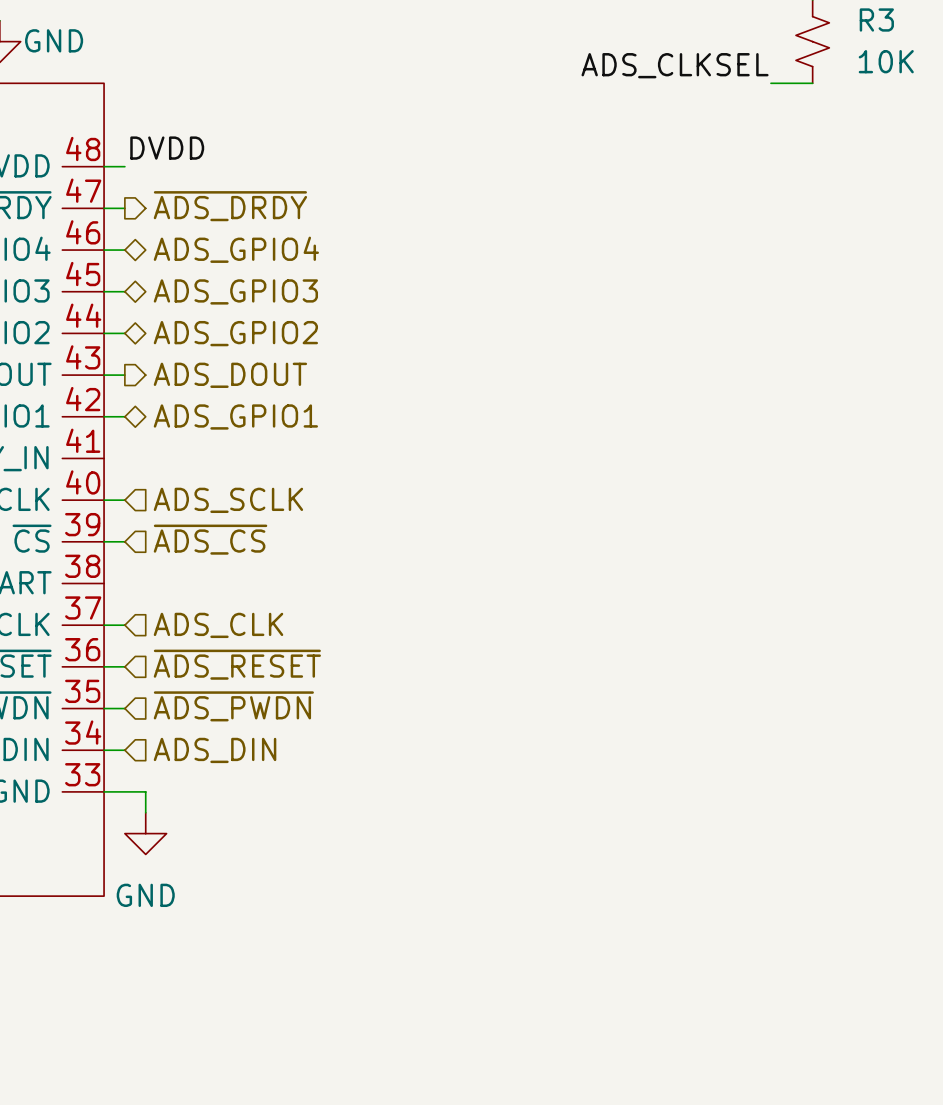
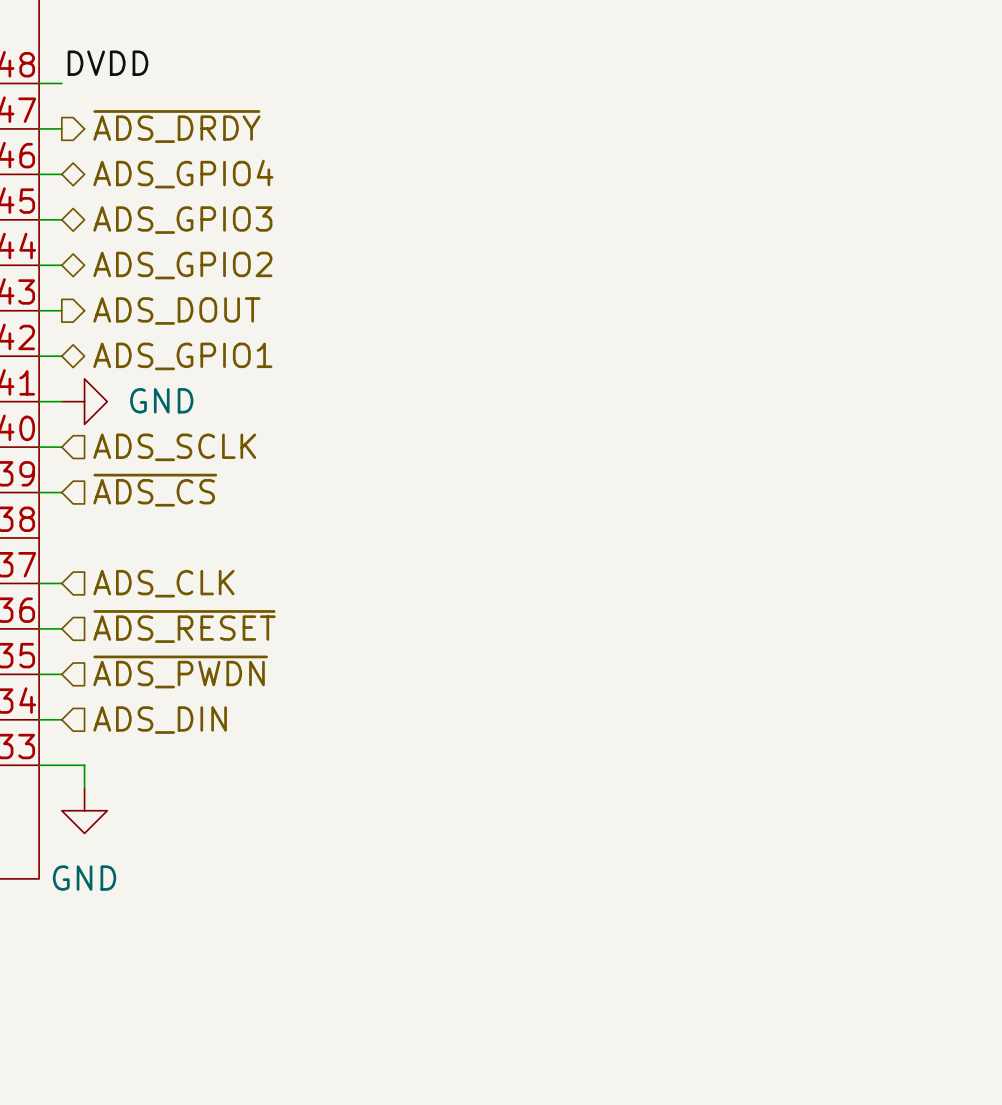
wire: none -> (39, 401) (61, 401)
power symbol: none -> GND (84, 401)

